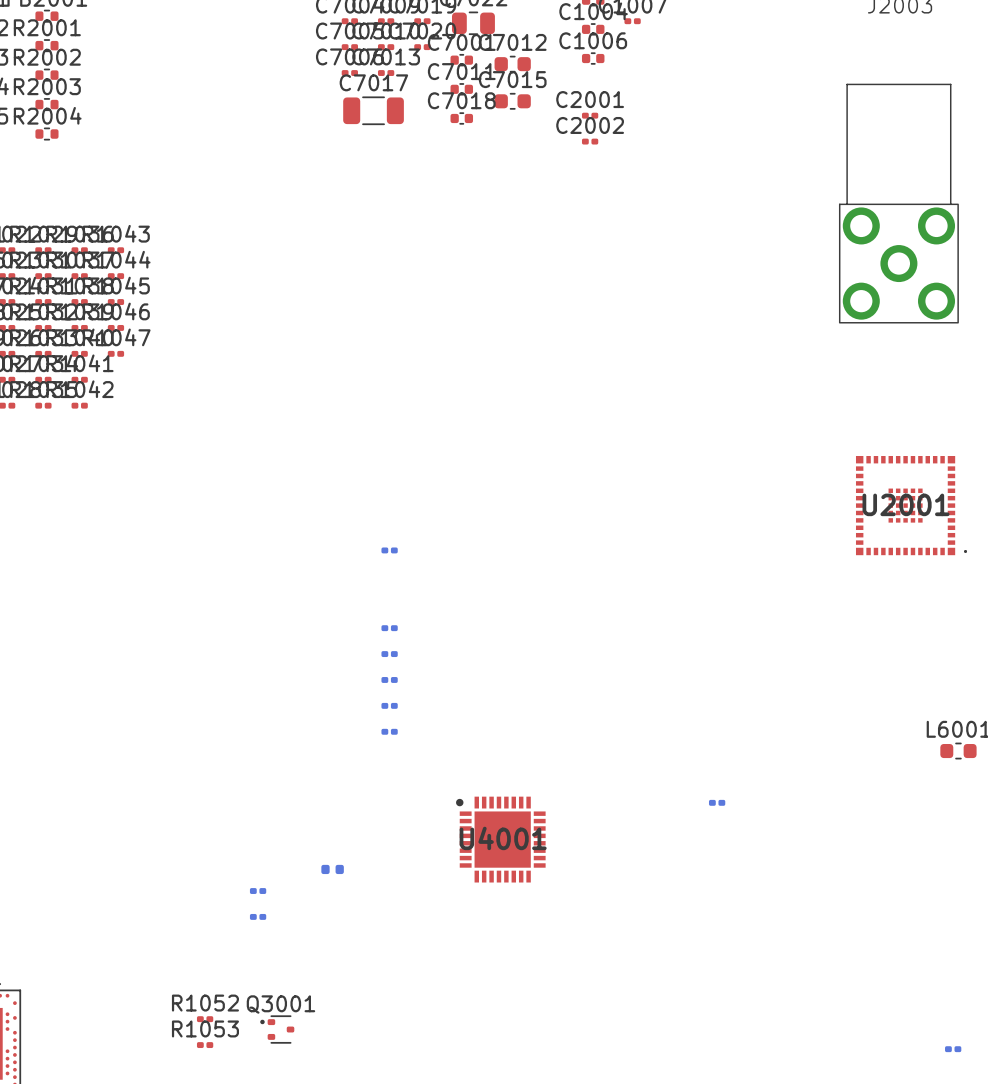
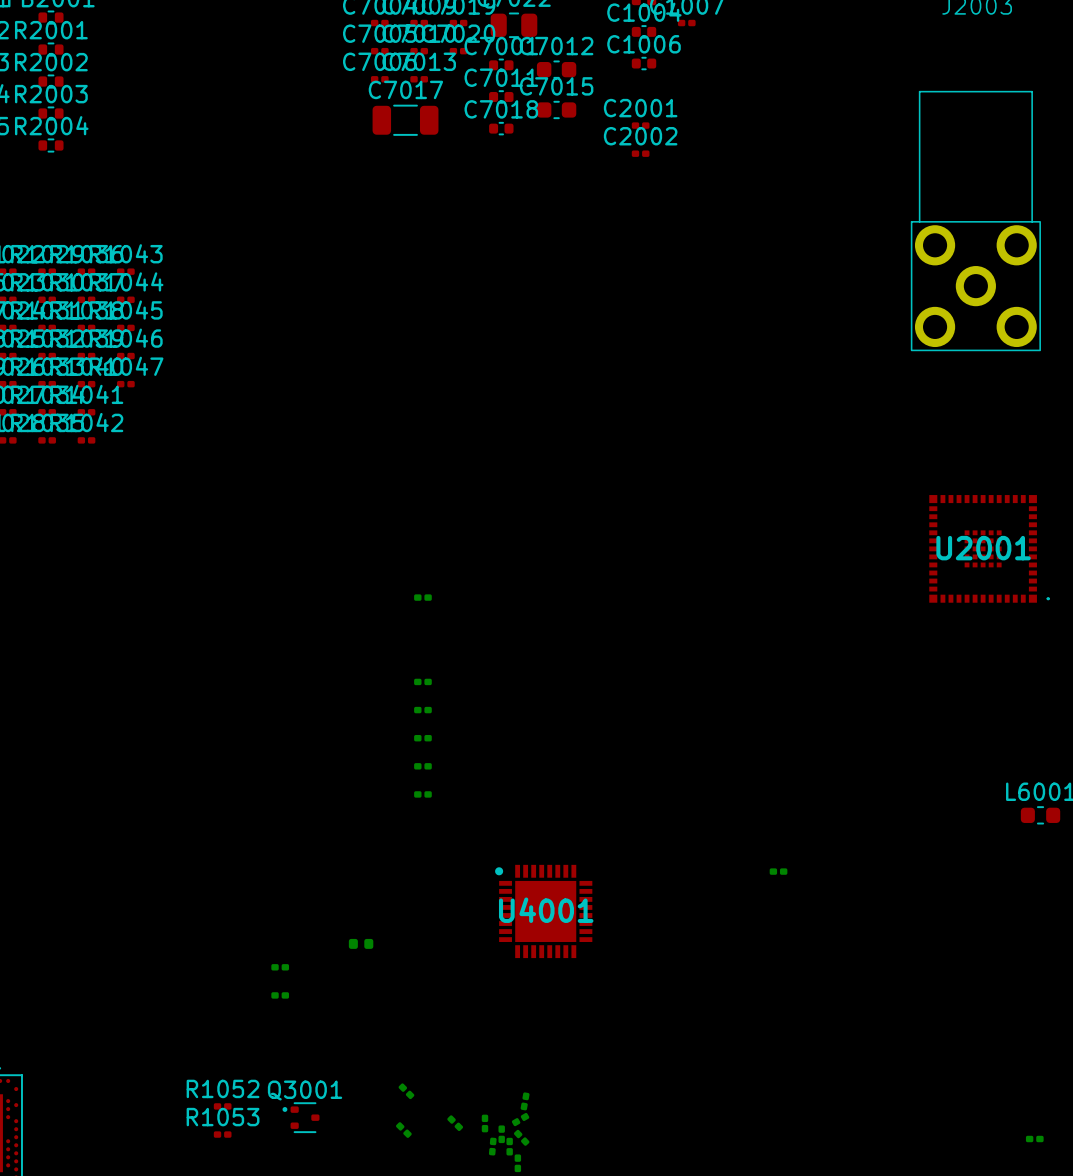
part: none -> (406, 1091)
part: none -> (525, 1101)
part: none -> (520, 1119)
part: none -> (455, 1123)
part: none -> (484, 1123)
part: none -> (403, 1130)
part: none -> (501, 1134)
part: none -> (521, 1137)
part: none -> (492, 1146)
part: none -> (509, 1146)
part: none -> (517, 1163)

